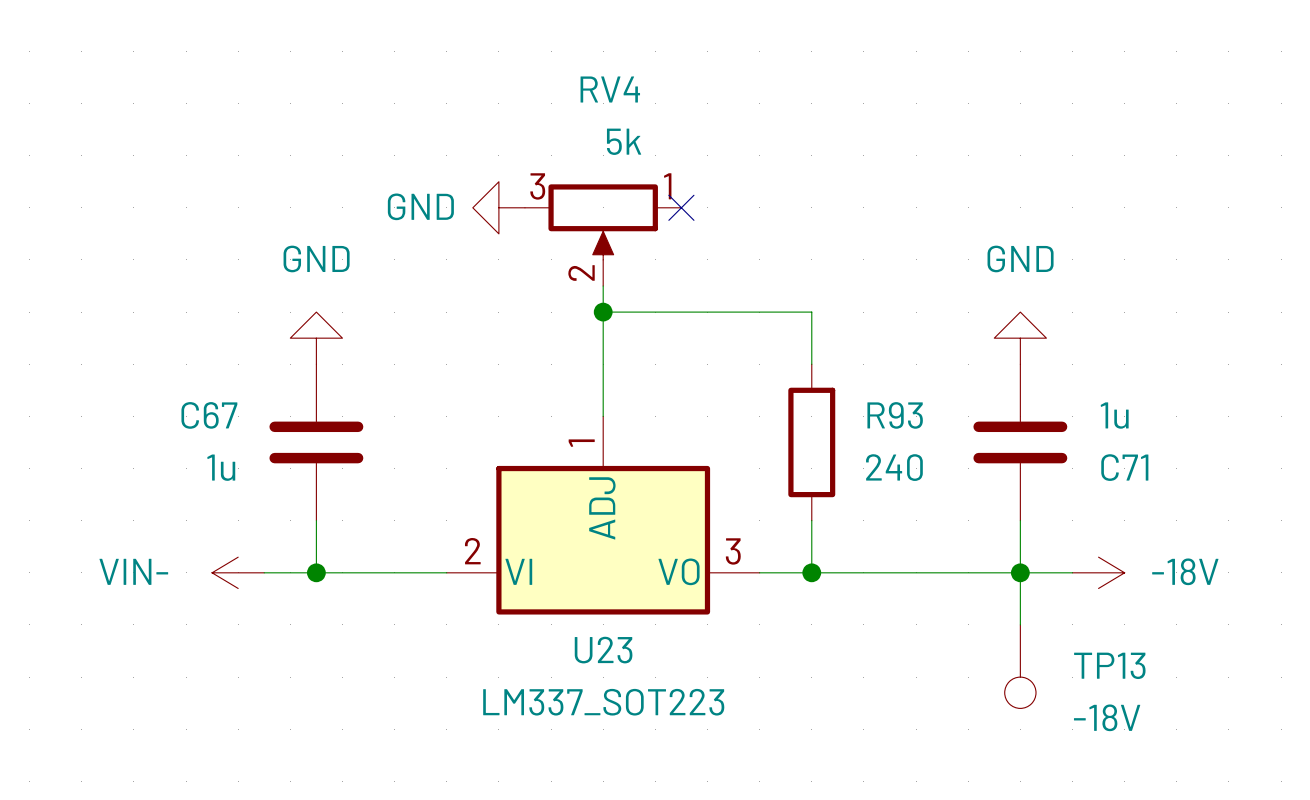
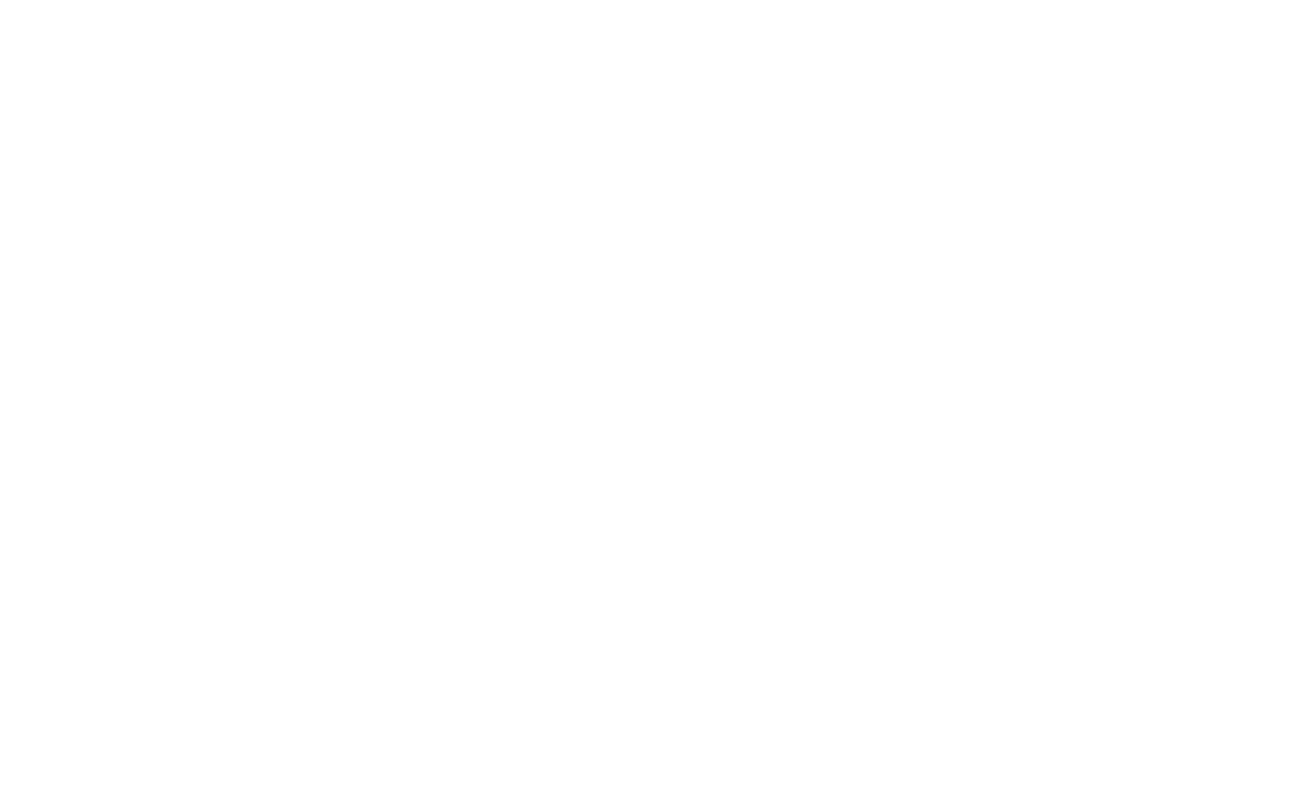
power symbol: GND (498, 207) -> none
no-connect mark: (681, 207) -> none
RV4: 5k (603, 235) -> none
wire: (603, 286) (603, 416) -> none
wire: (603, 312) (811, 312) (811, 364) -> none
junction: (603, 312) -> none
power symbol: GND (316, 338) -> none
power symbol: GND (1020, 338) -> none
C67: 1u (316, 442) -> none
R93: 240 (811, 442) -> none
C71: 1u (1020, 442) -> none
U23: LM337_SOT223 (603, 515) -> none
wire: (316, 520) (316, 572) -> none
wire: (811, 520) (811, 572) -> none
wire: (1020, 520) (1020, 624) -> none
power symbol: VIN- (238, 572) -> none
wire: (264, 572) (446, 572) -> none
junction: (316, 572) -> none
wire: (759, 572) (1072, 572) -> none
junction: (811, 572) -> none
junction: (1020, 572) -> none
power symbol: -18V (1098, 572) -> none
TP13: -18V (1020, 666) -> none

